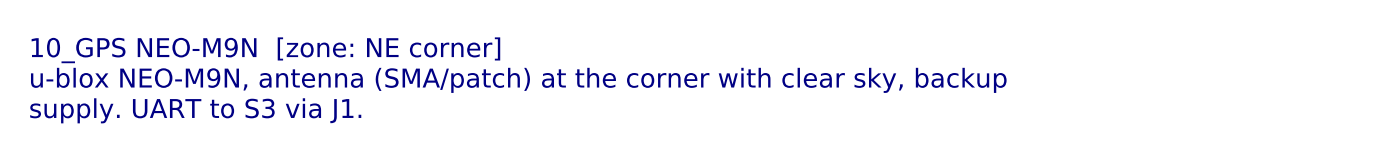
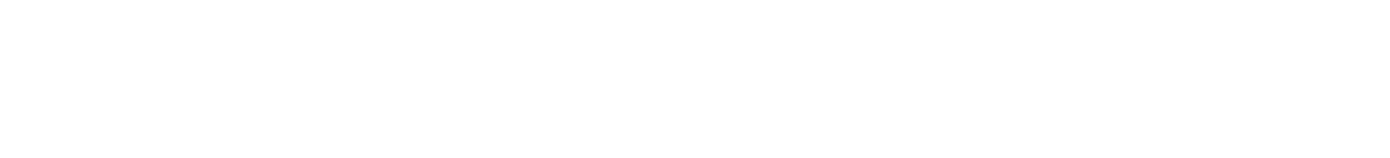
text: 10_GPS NEO-M9N [zone: NE corner] (265, 50) -> none
text: u-blox NEO-M9N, antenna (SMA/patch) at the corner with clear sky, backup (518, 80) -> none
text: supply. UART to S3 via J1. (195, 110) -> none

